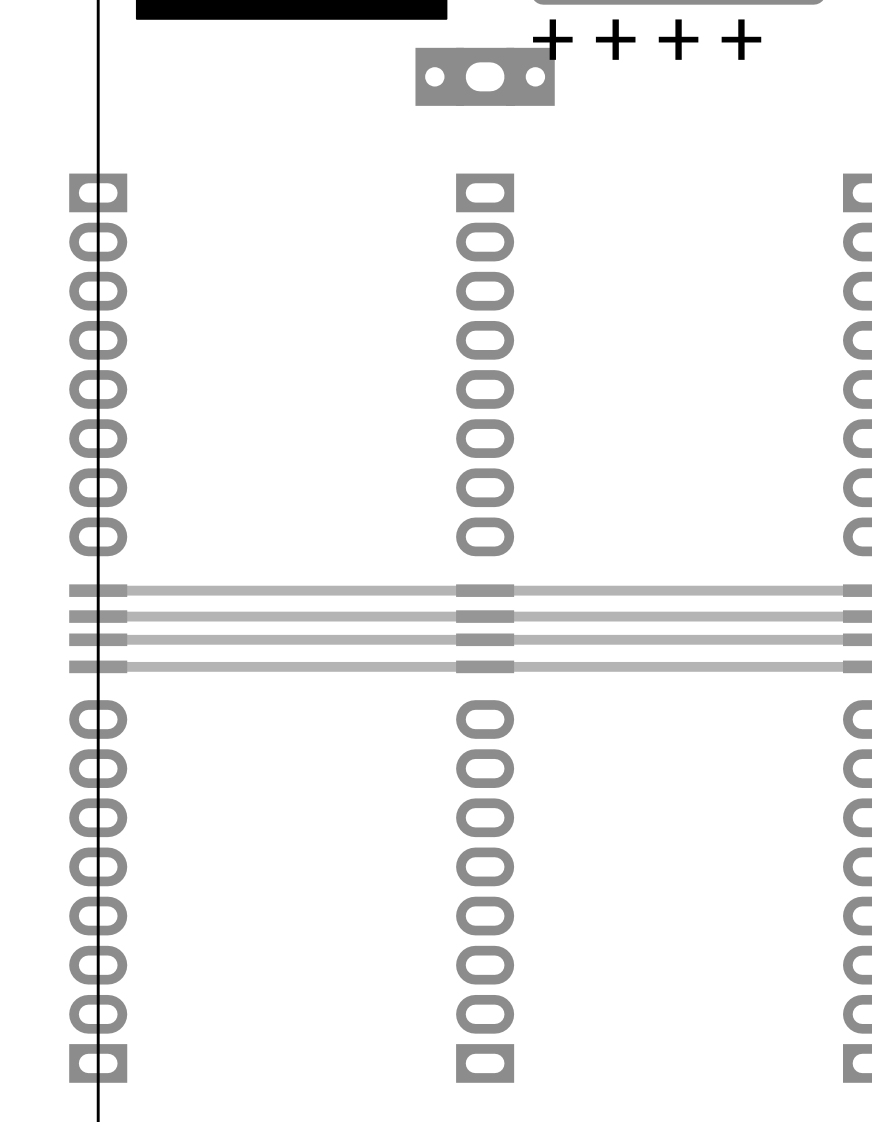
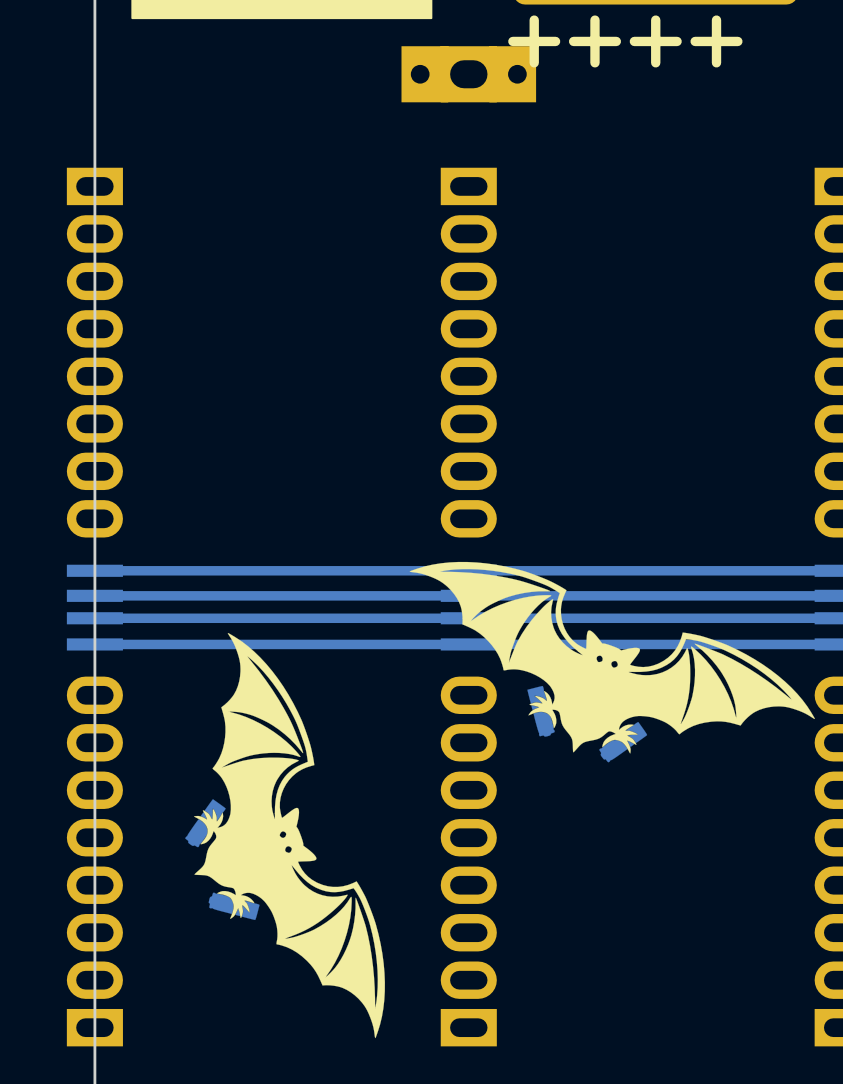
drawing: none -> [409, 561, 815, 763]
drawing: none -> [185, 632, 385, 1039]

